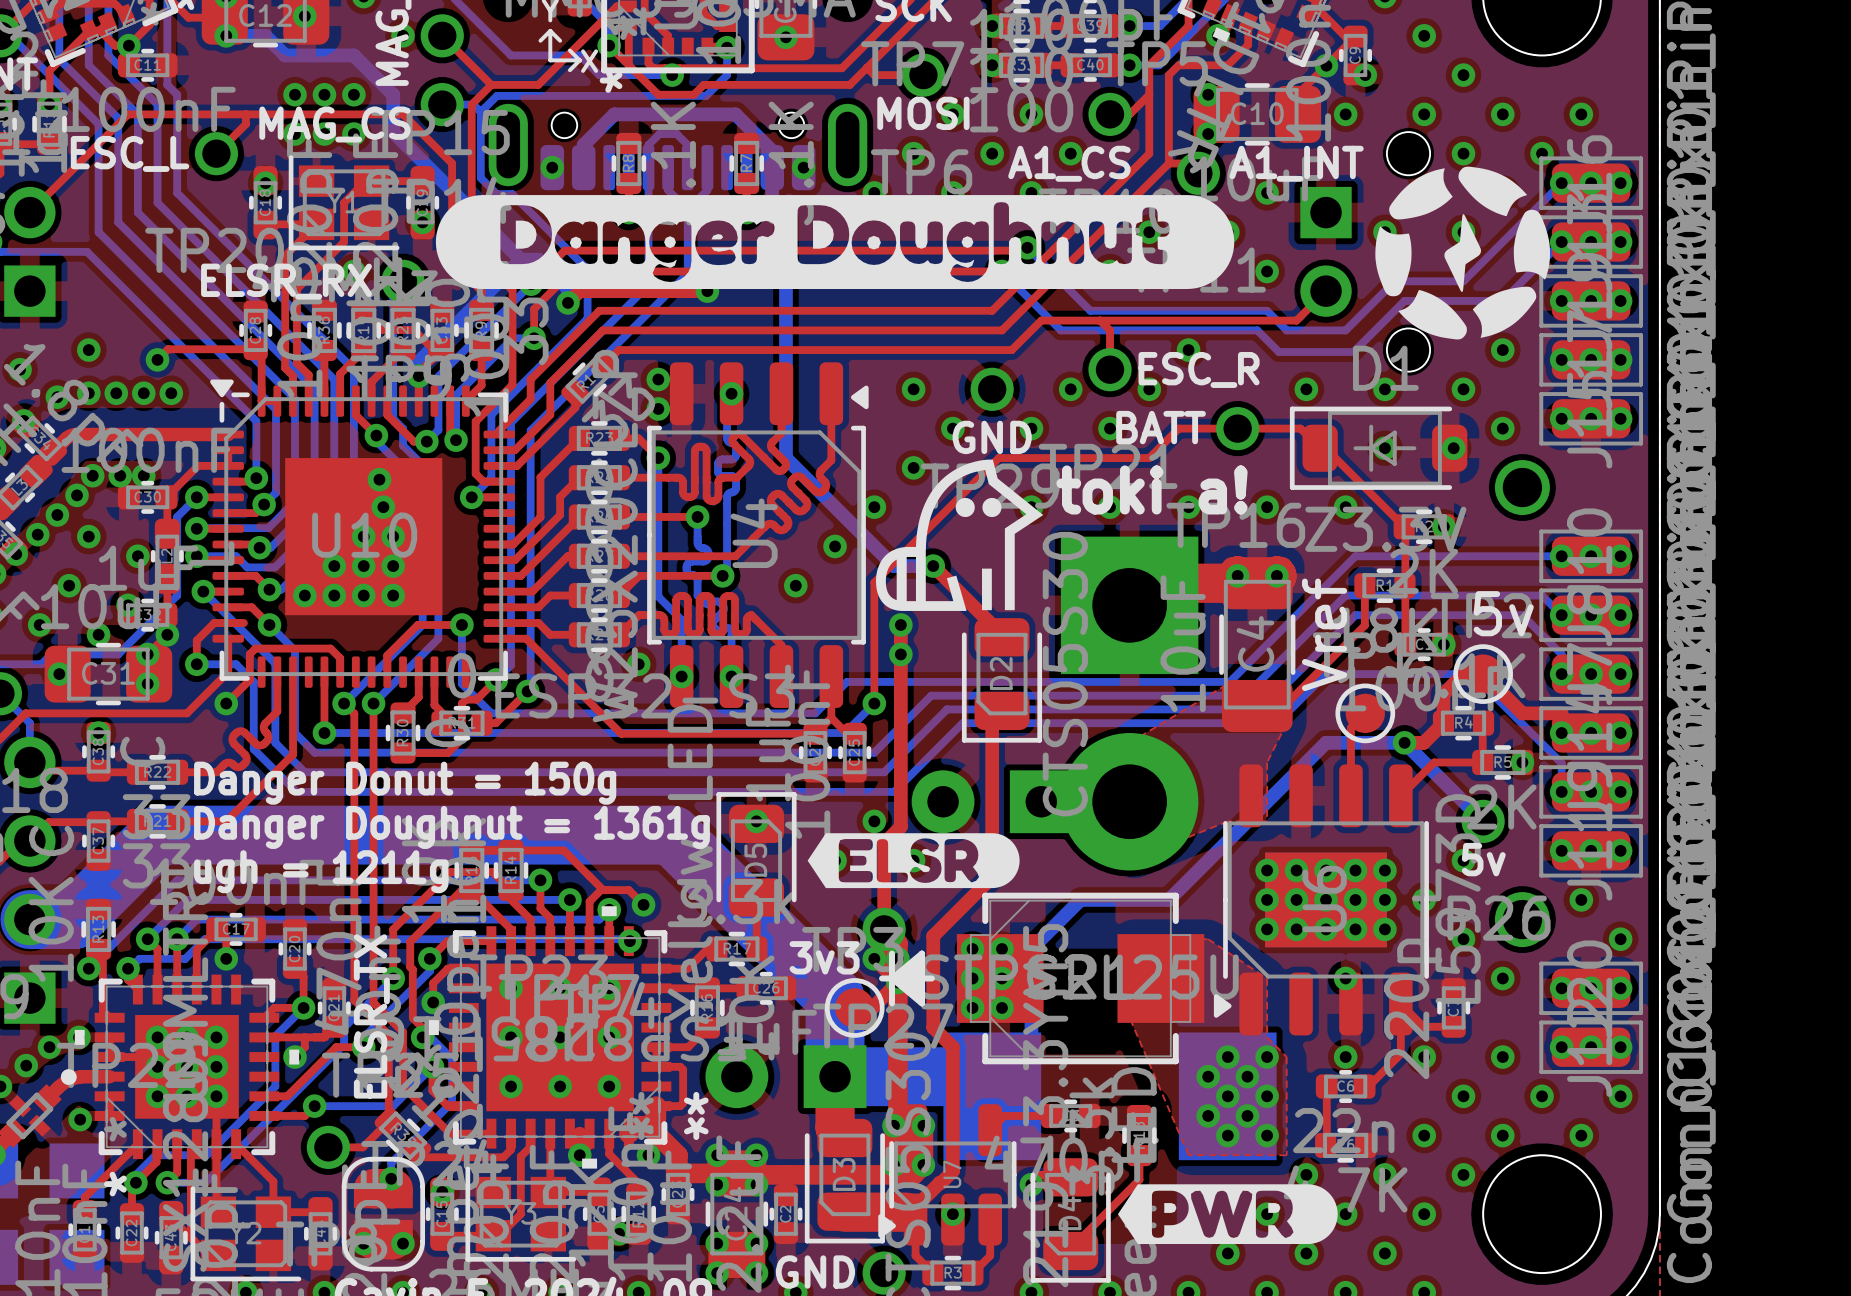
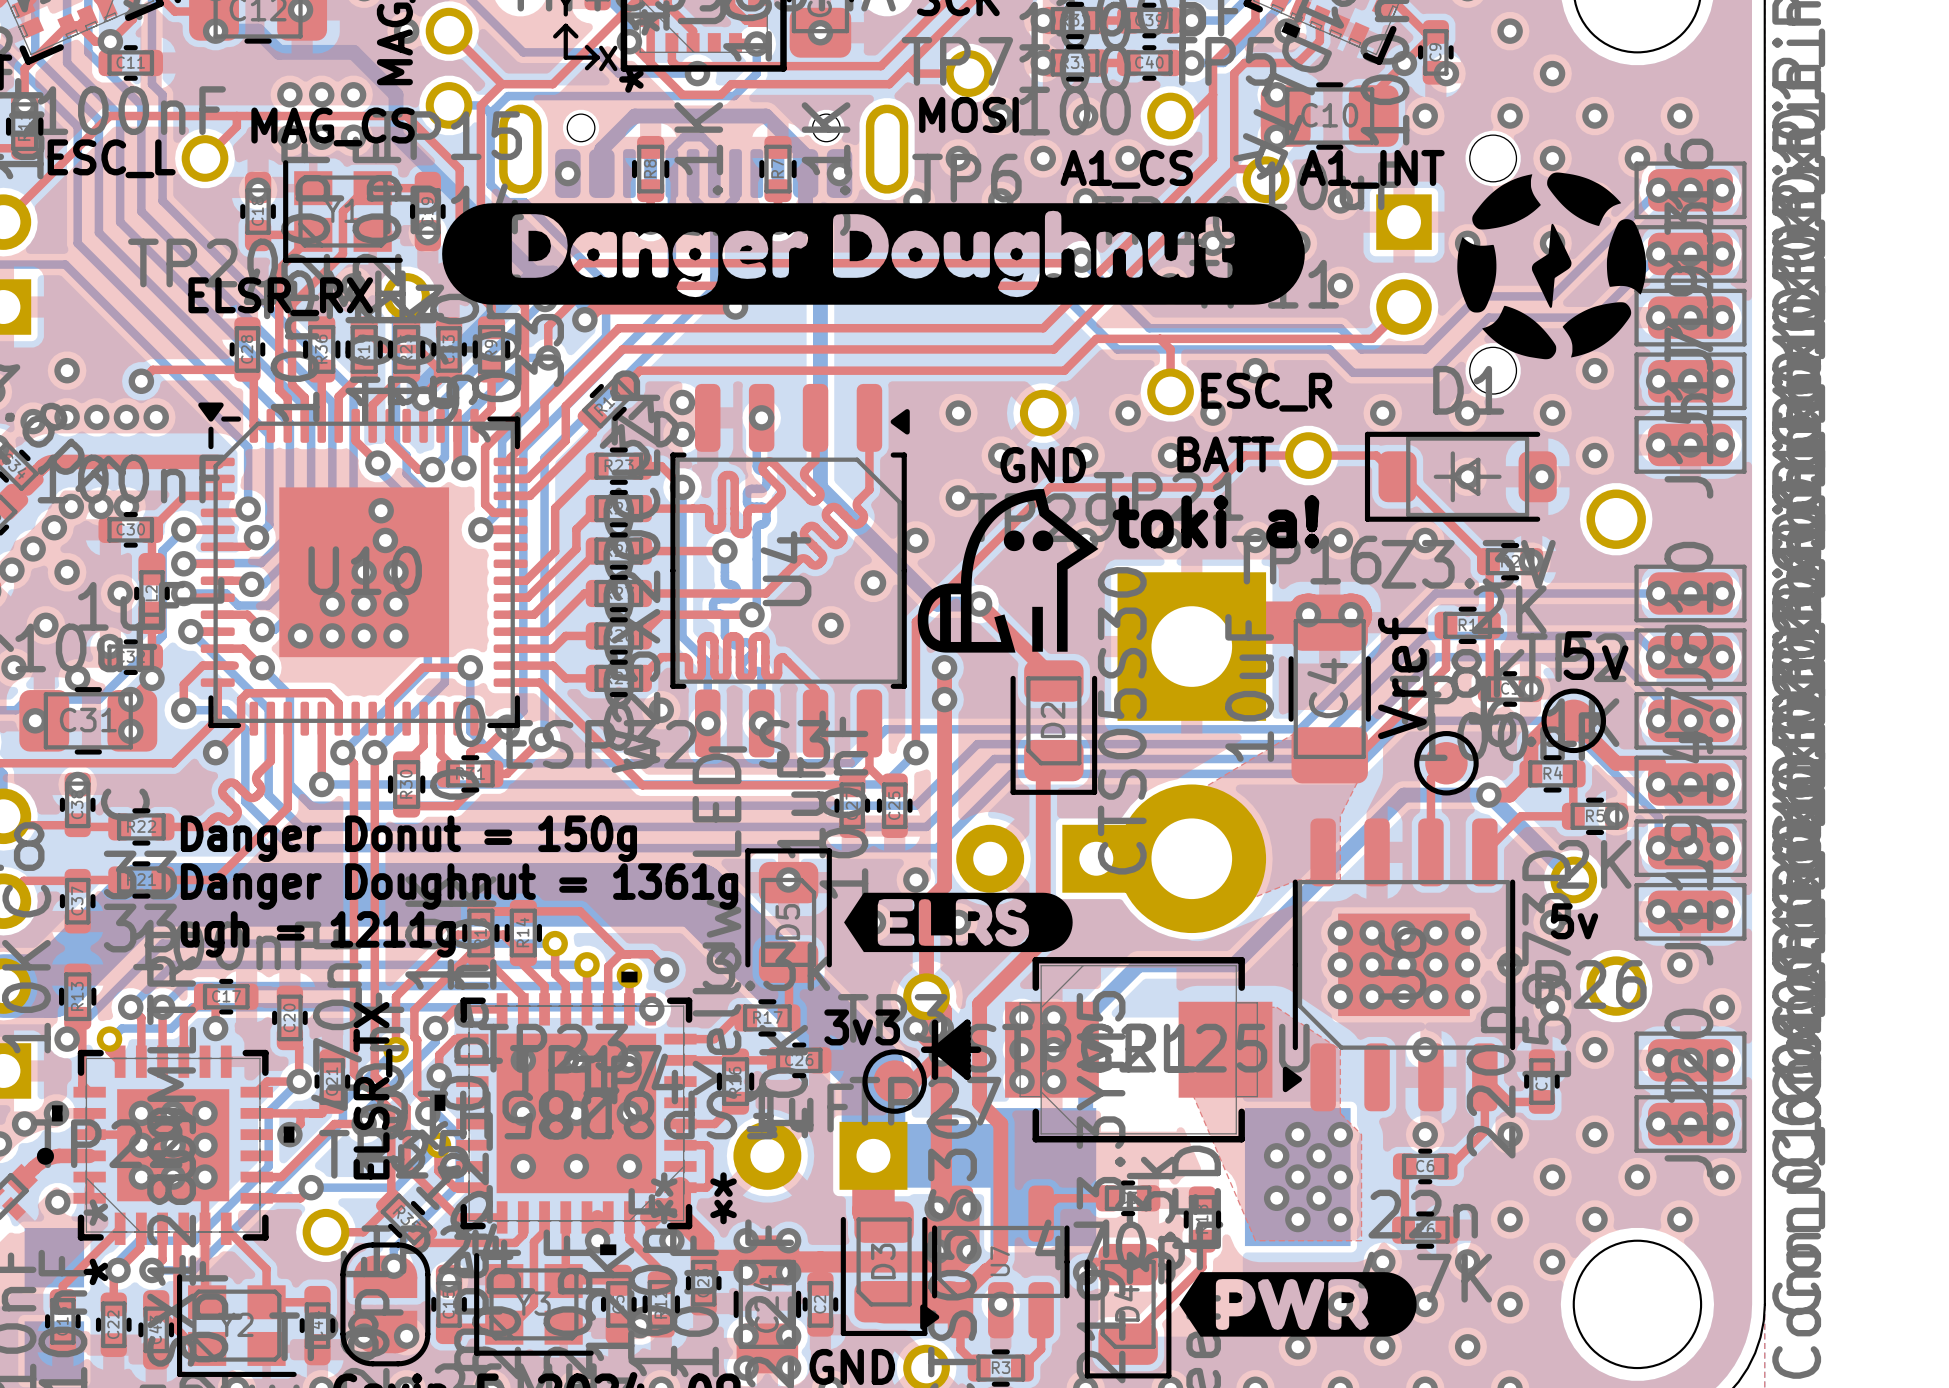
drawing shape: [807, 833, 1020, 889] -> [844, 892, 1073, 953]

